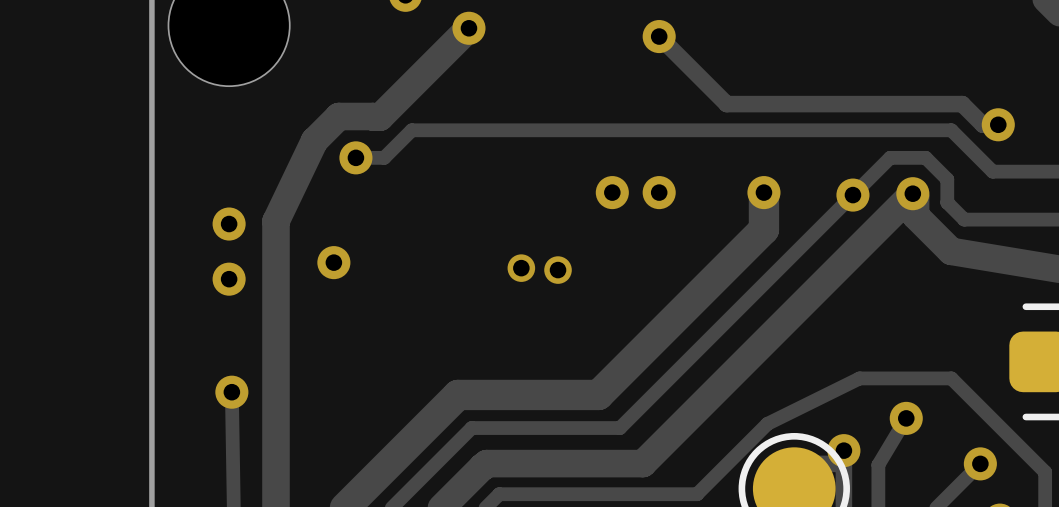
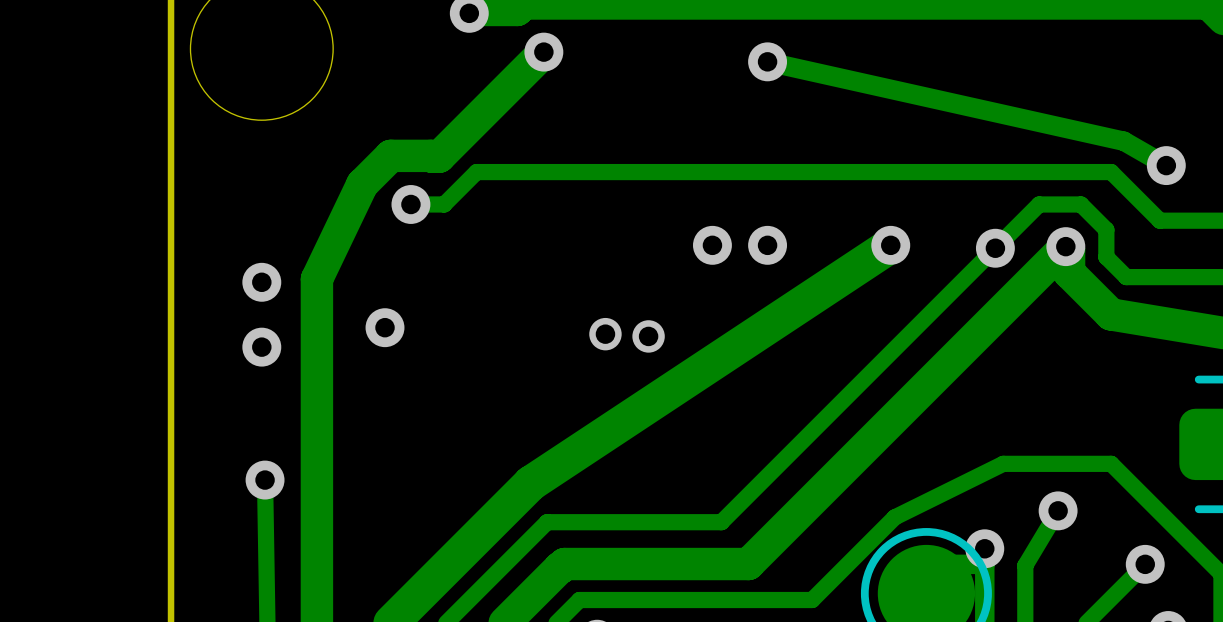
track: (659, 36) (726, 104) (962, 104) (982, 124) (998, 124) -> (767, 61) (1123, 141) (1166, 165)
track: (763, 192) (763, 229) (598, 394) (457, 394) -> (890, 245) (530, 483)

